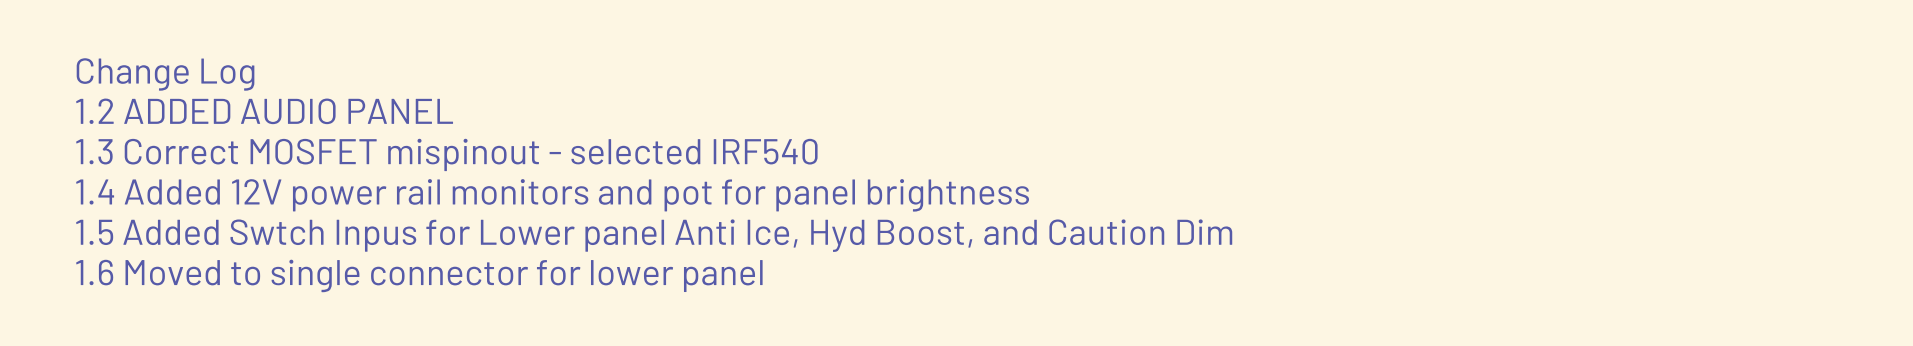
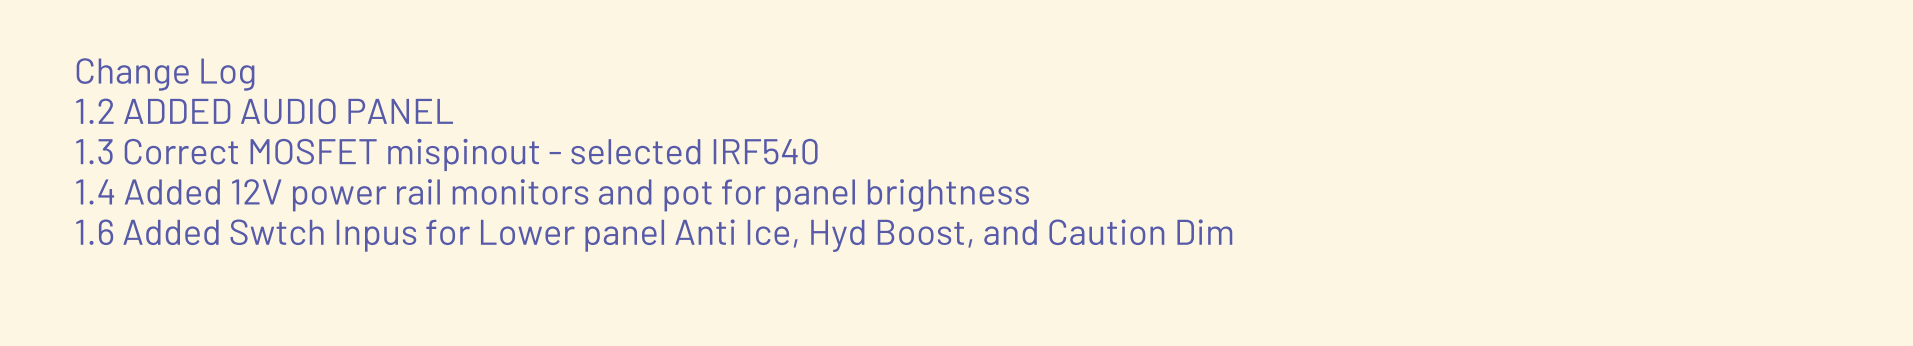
text: 1.5 Added Swtch Inpus for Lower panel Anti Ice, Hyd Boost, and Caution Dim (654, 235) -> 1.6 Added Swtch Inpus for Lower panel Anti Ice, Hyd Boost, and Caution Dim (654, 235)
text: 1.6 Moved to single connector for lower panel (419, 275) -> none

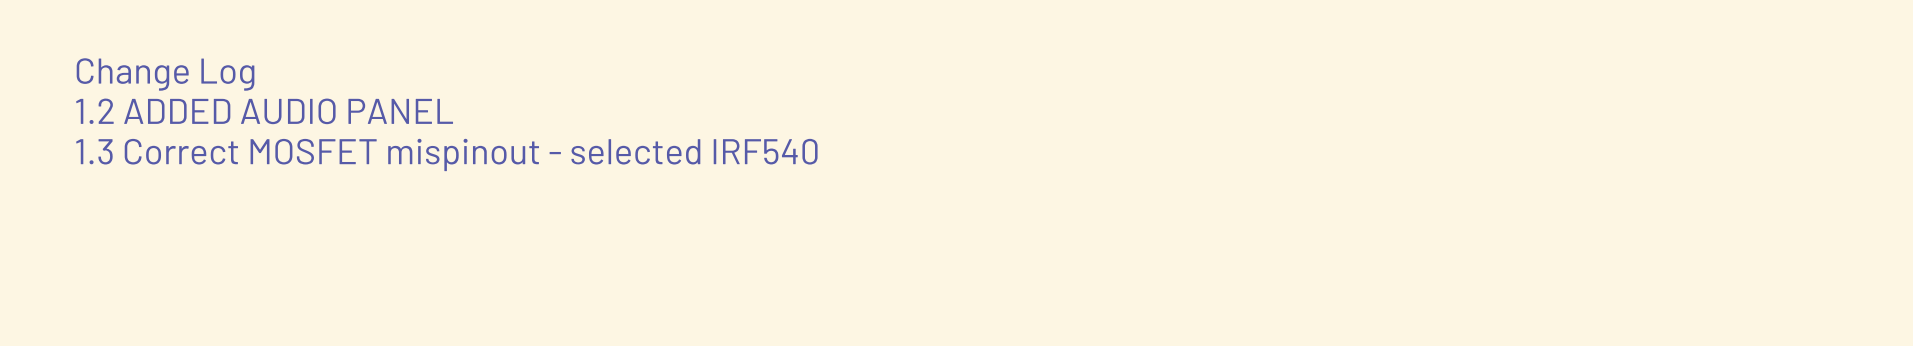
text: 1.4 Added 12V power rail monitors and pot for panel brightness (552, 195) -> none
text: 1.6 Added Swtch Inpus for Lower panel Anti Ice, Hyd Boost, and Caution Dim (654, 235) -> none

